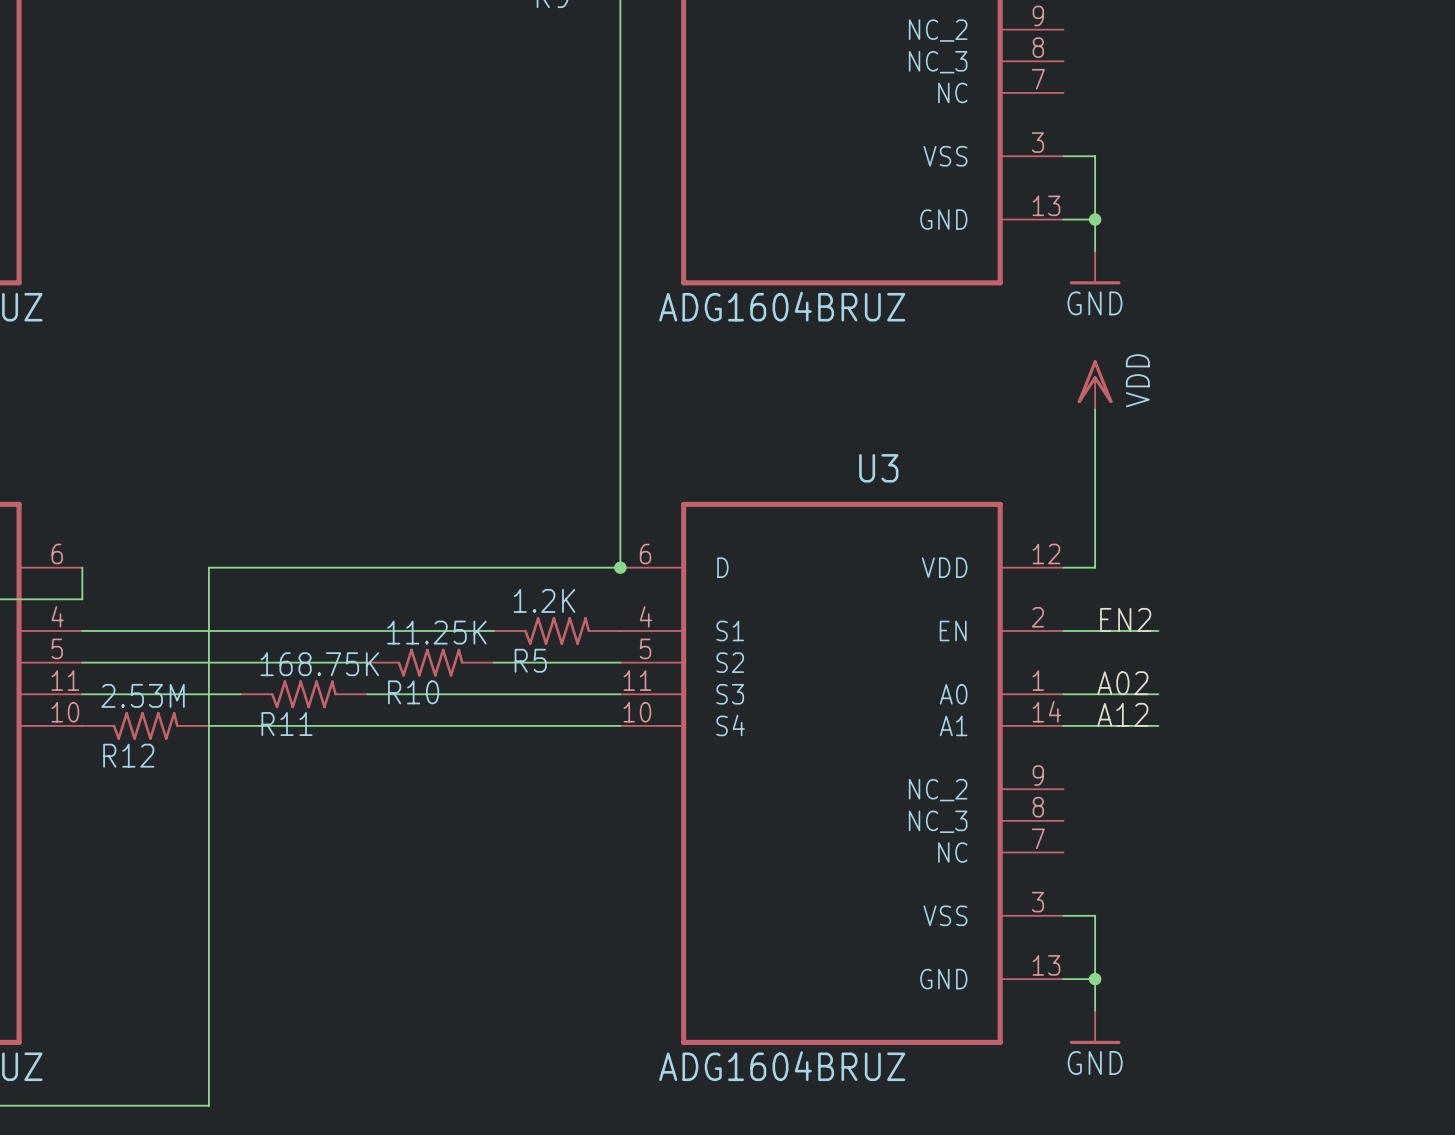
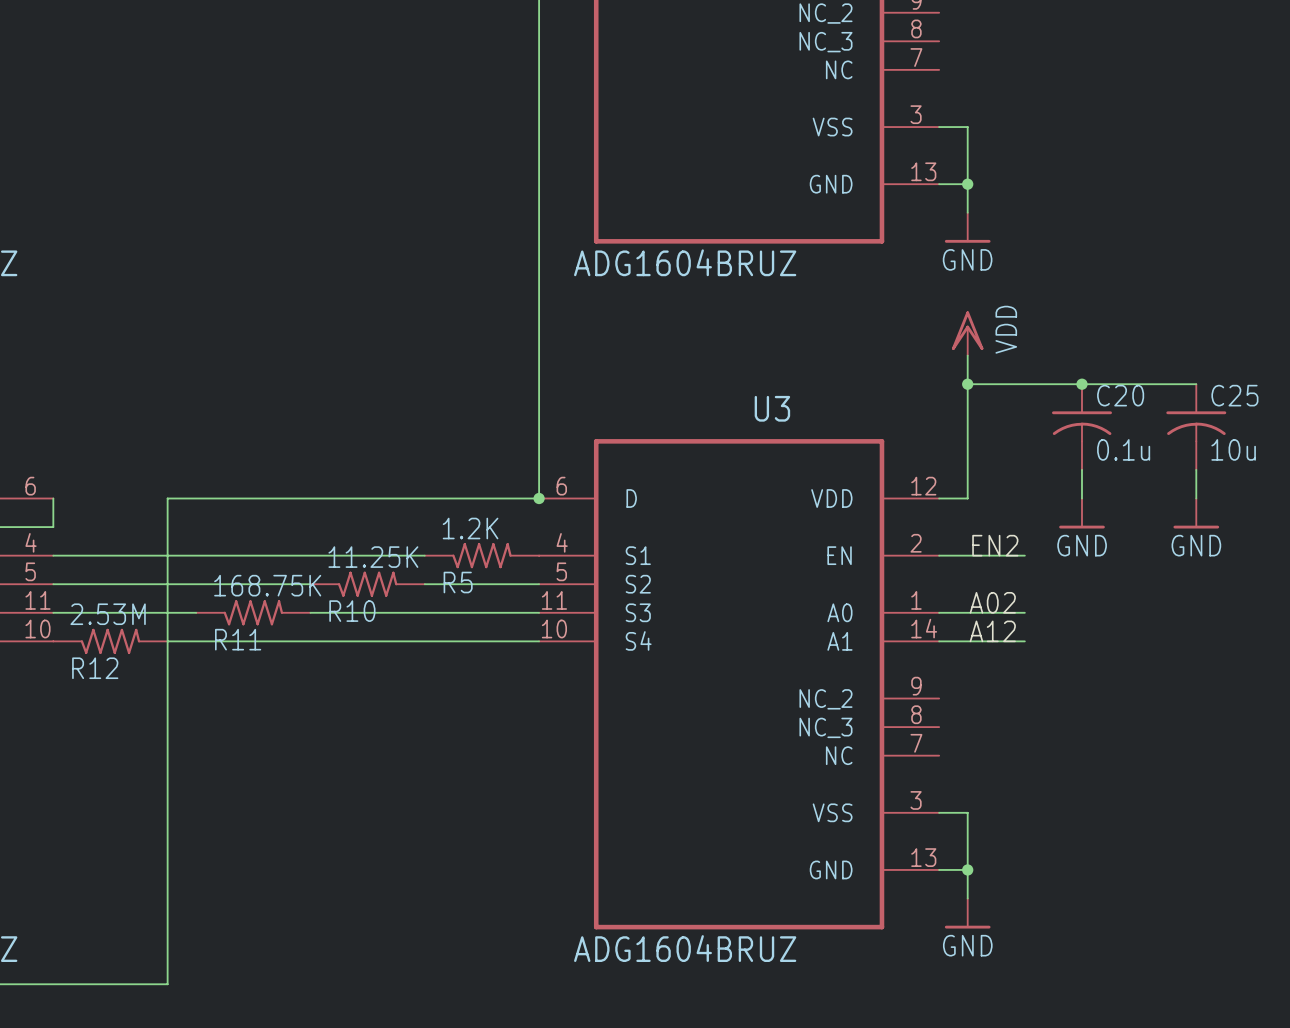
wire: none -> (967, 384) (1196, 384)
junction: none -> (967, 384)
junction: none -> (1081, 384)
C20: none -> 0.1u (1081, 427)
C25: none -> 10u (1196, 427)
wire: none -> (1081, 469) (1081, 498)
wire: none -> (1196, 469) (1196, 498)
power symbol: none -> GND (1081, 513)
power symbol: none -> GND (1196, 513)

